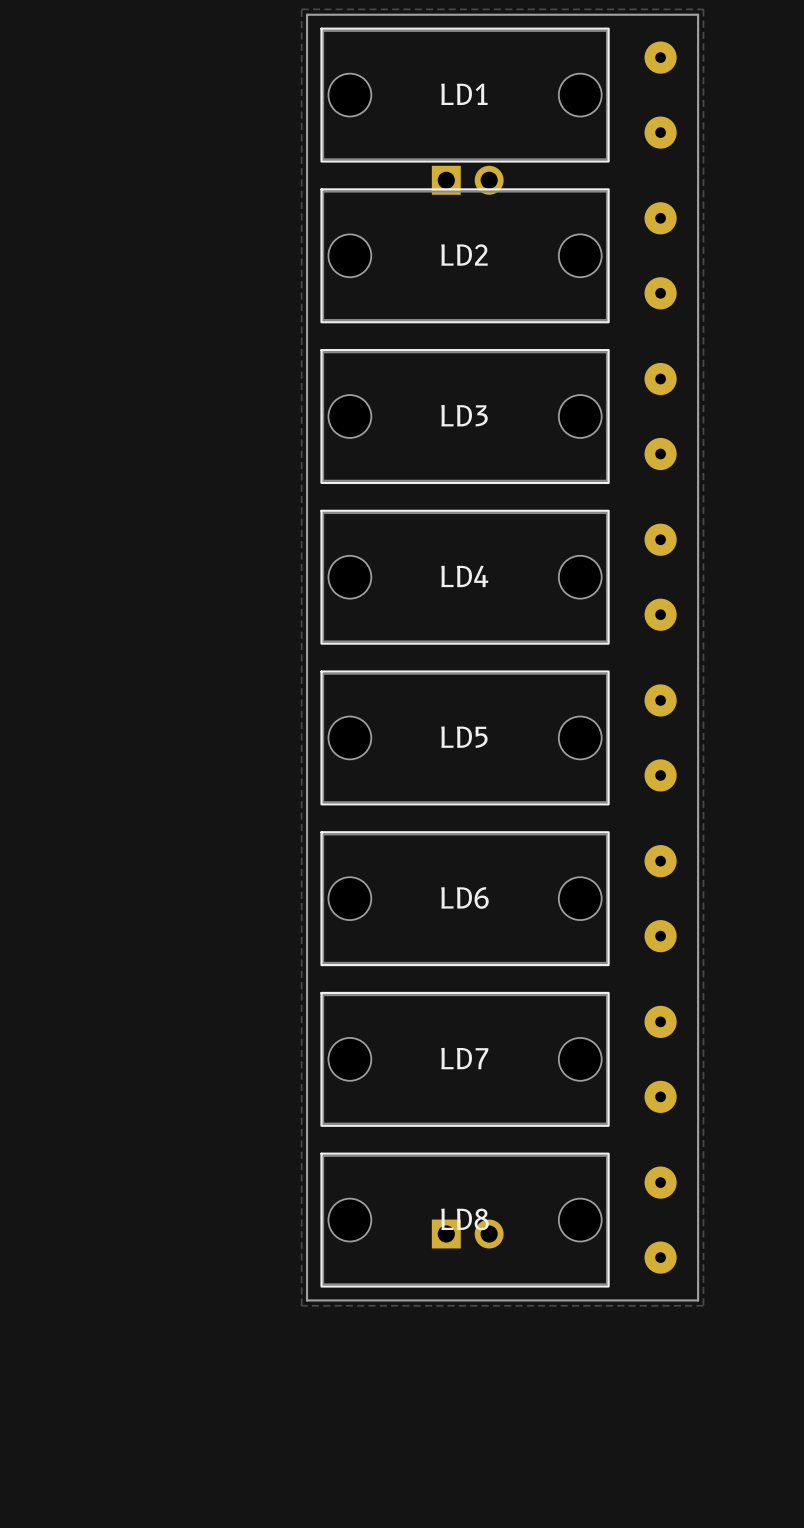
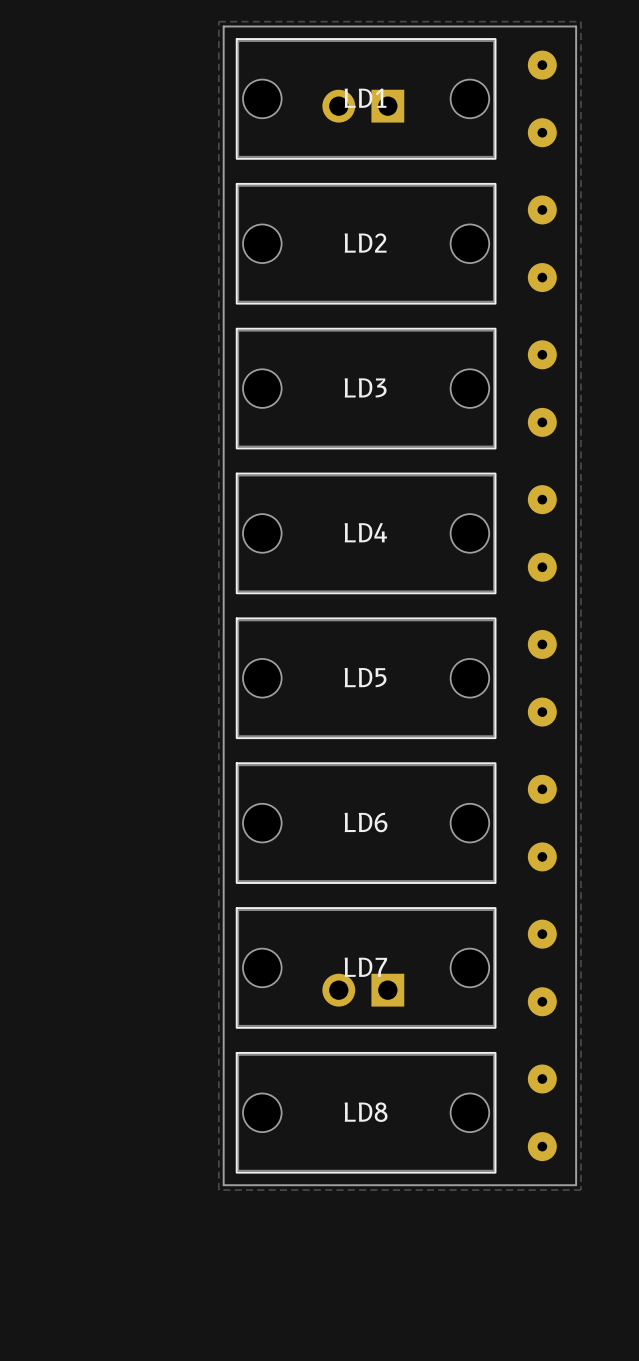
part: none -> (363, 106)
part: (467, 180) -> none
part: none -> (363, 990)
part: (467, 1234) -> none

